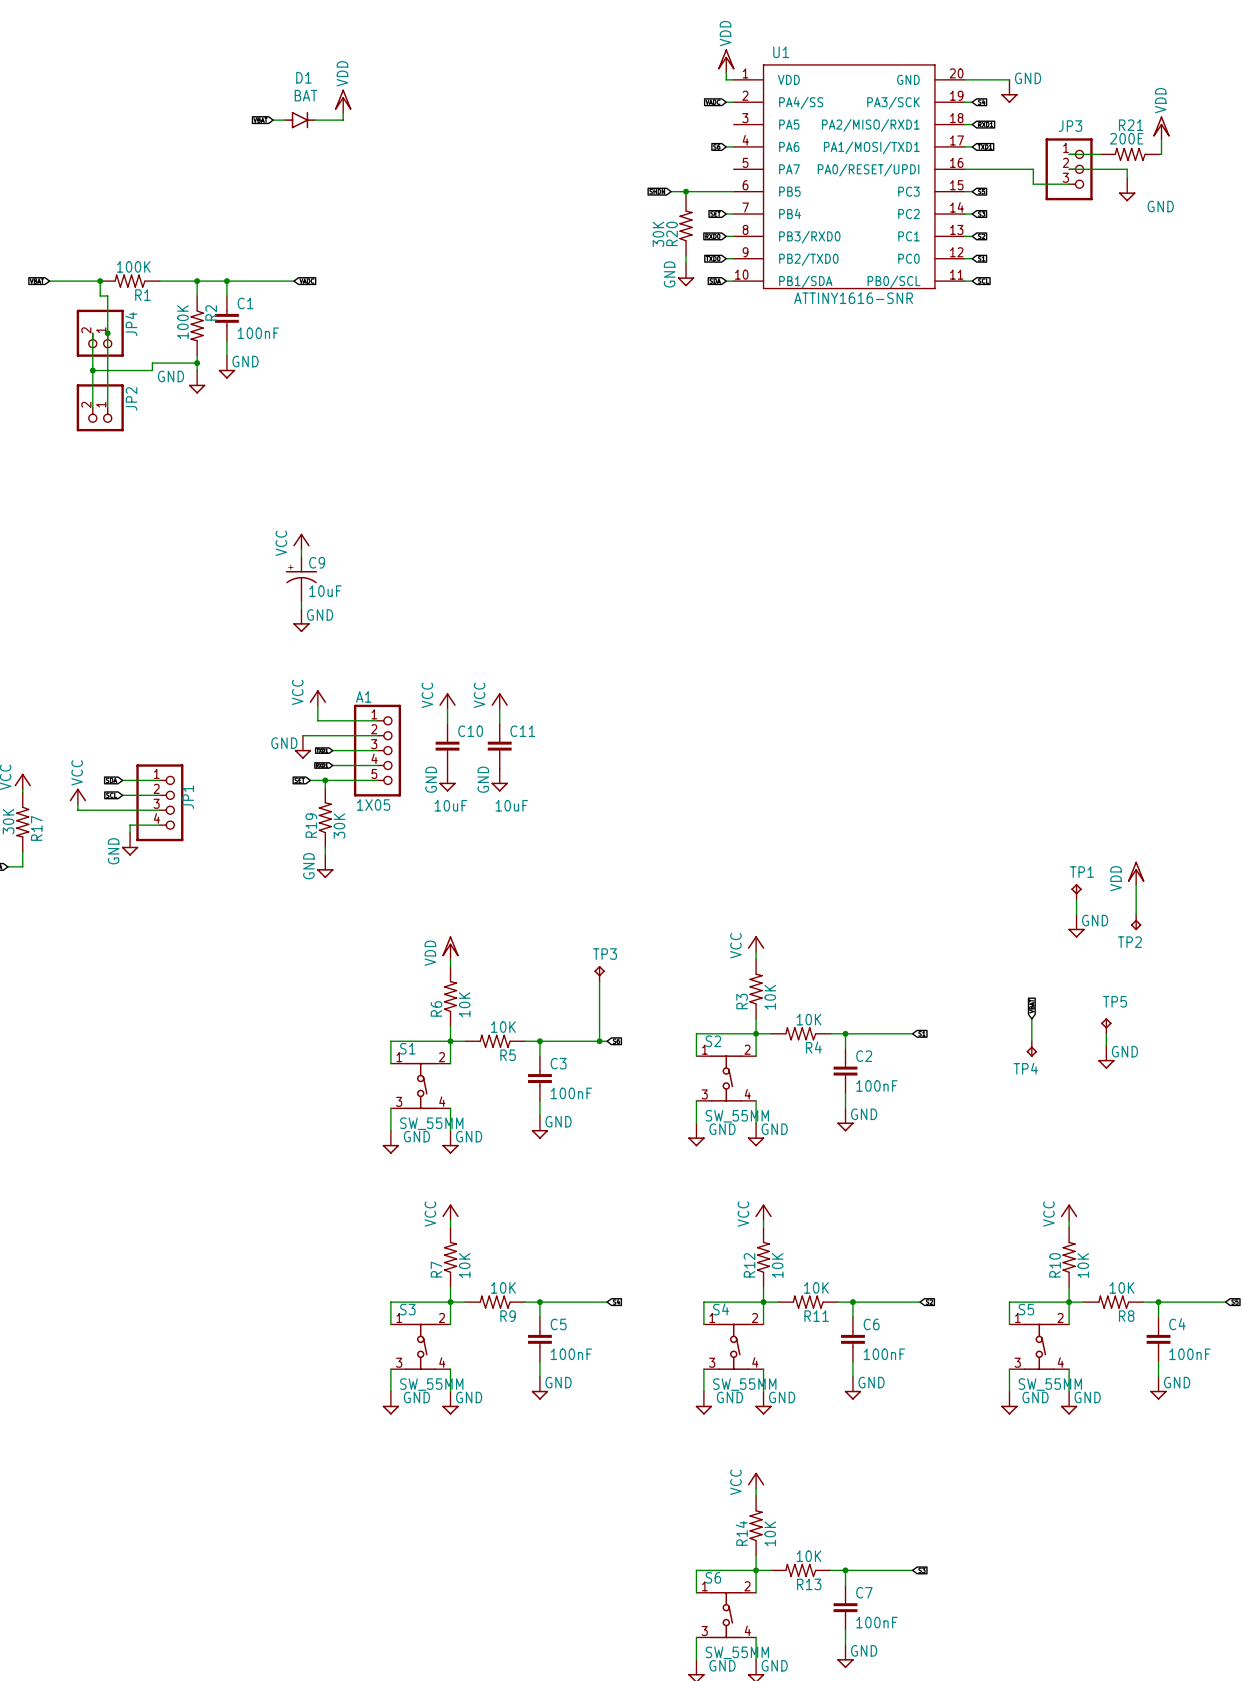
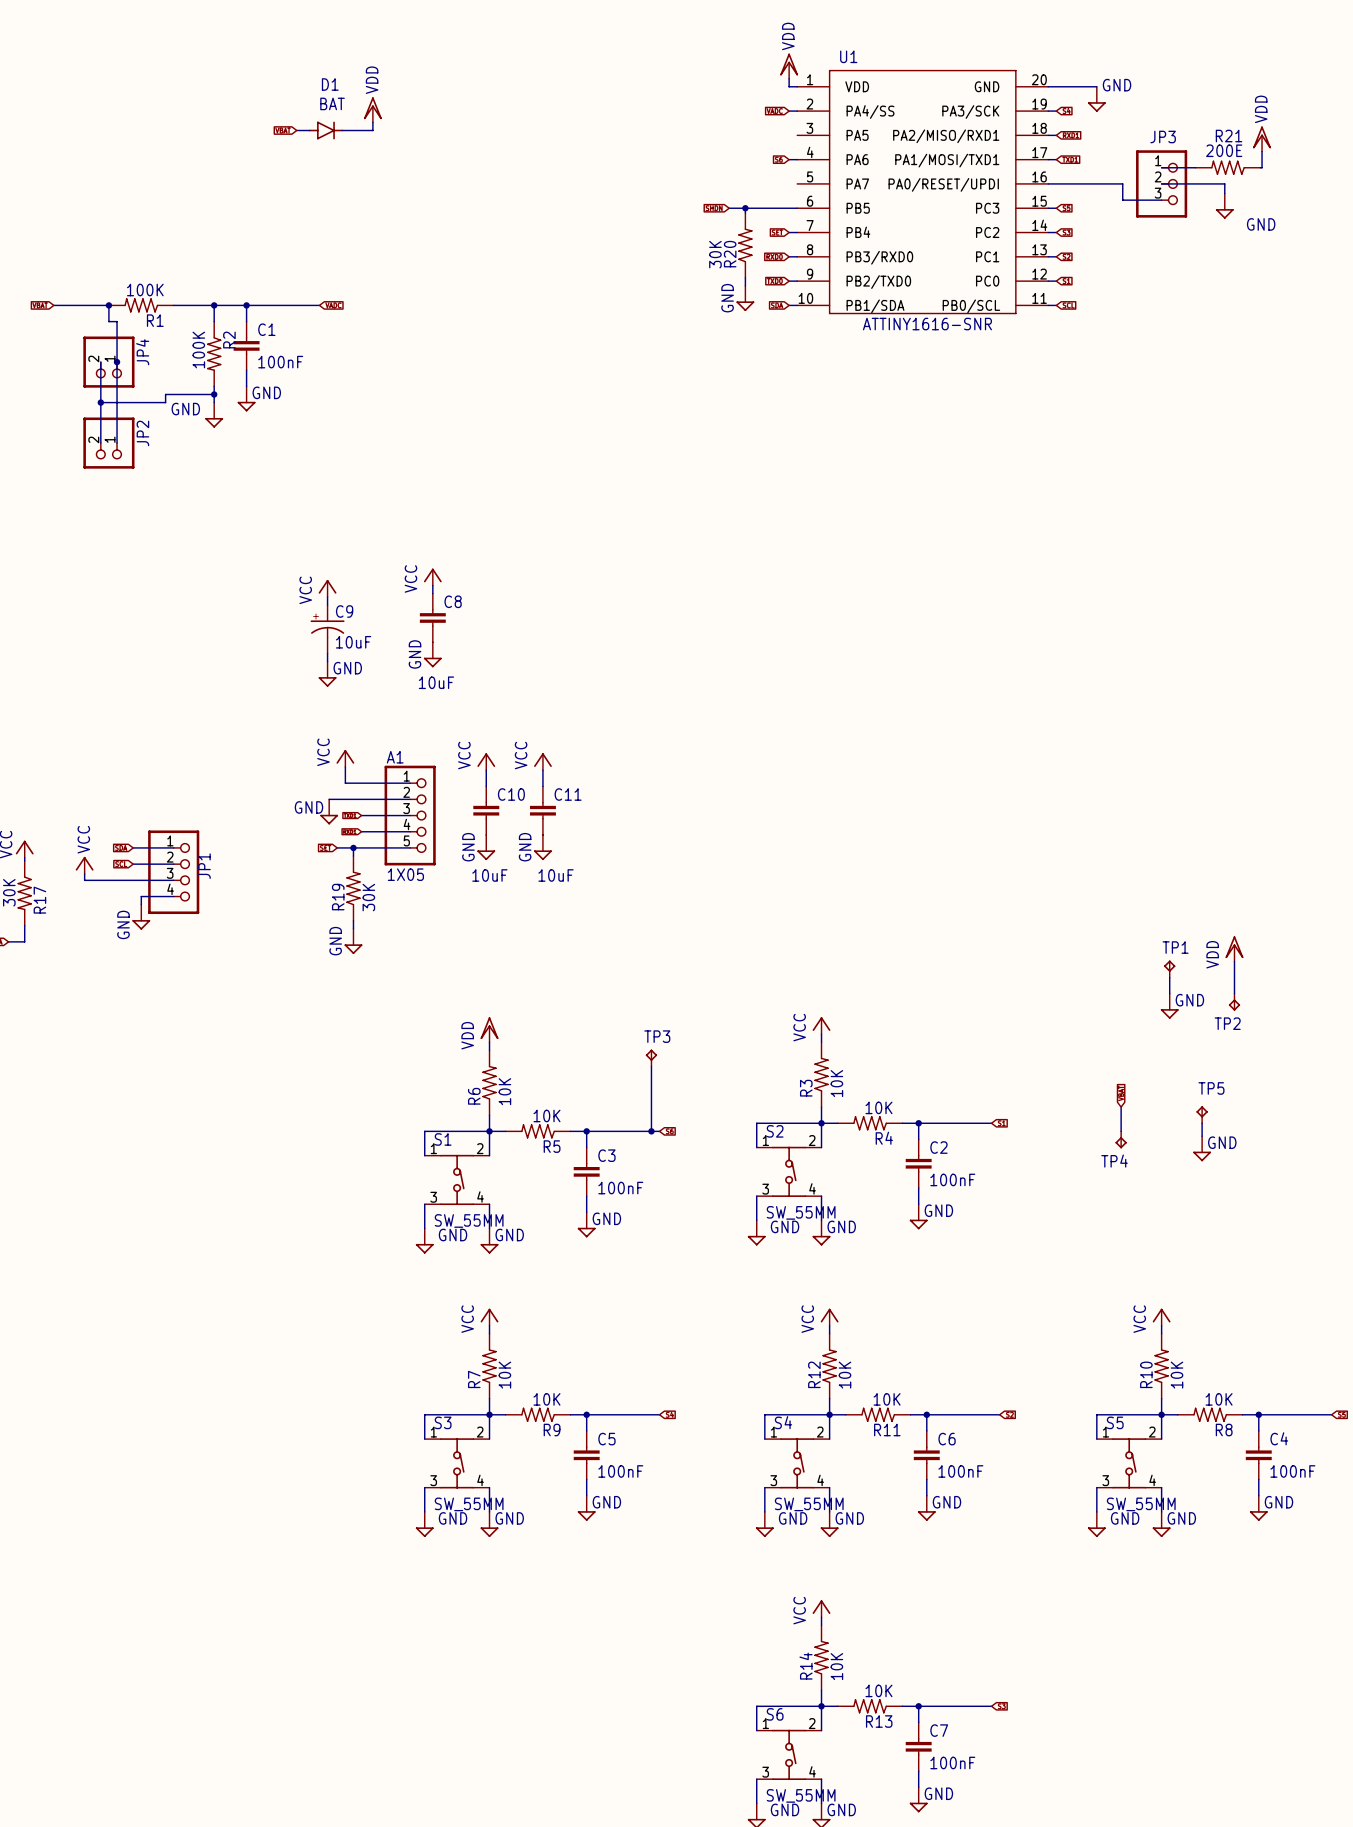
power symbol: none -> VCC (432, 577)
wire: none -> (432, 585) (432, 593)
C8: none -> 10uF (432, 617)
power symbol: none -> GND (432, 654)

